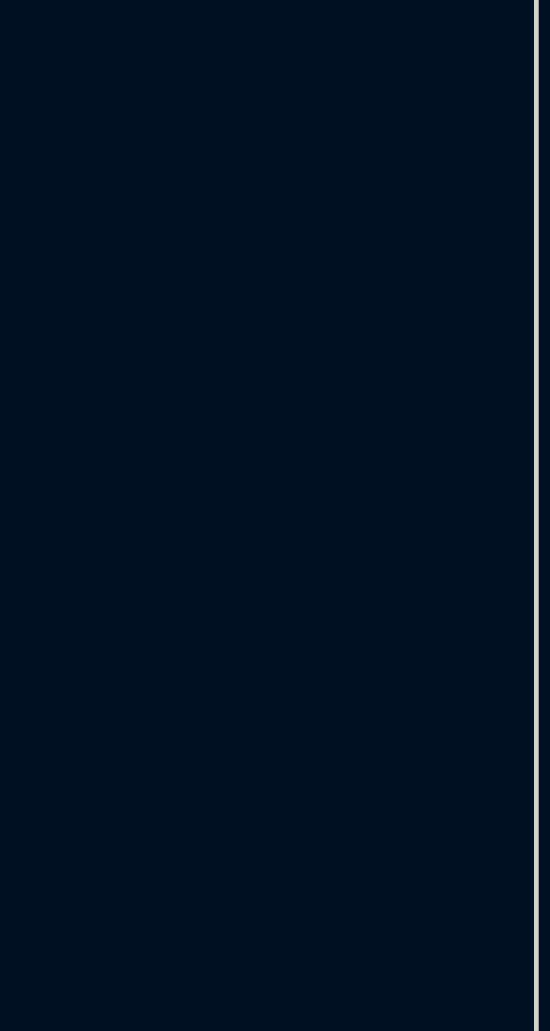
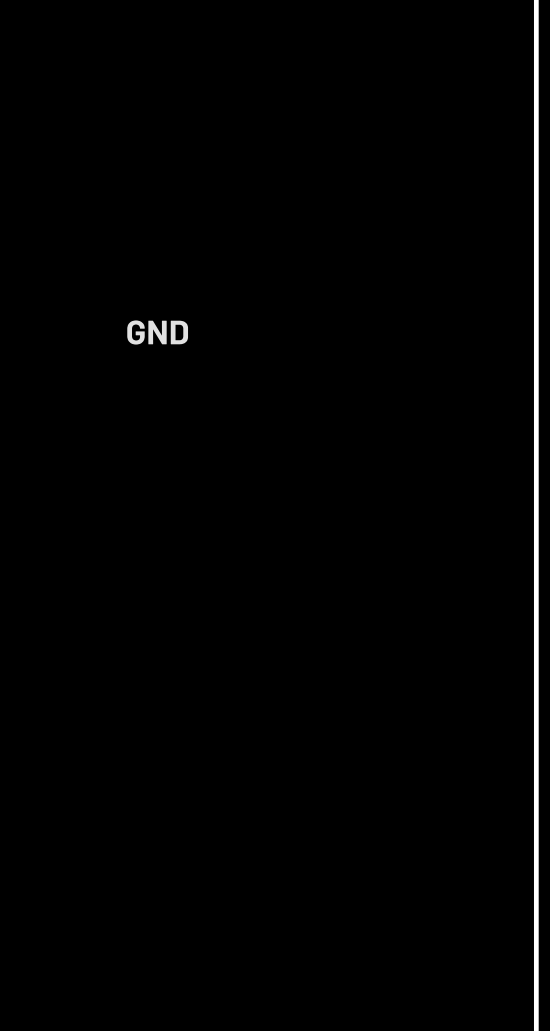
text: none -> GND (157, 332)

